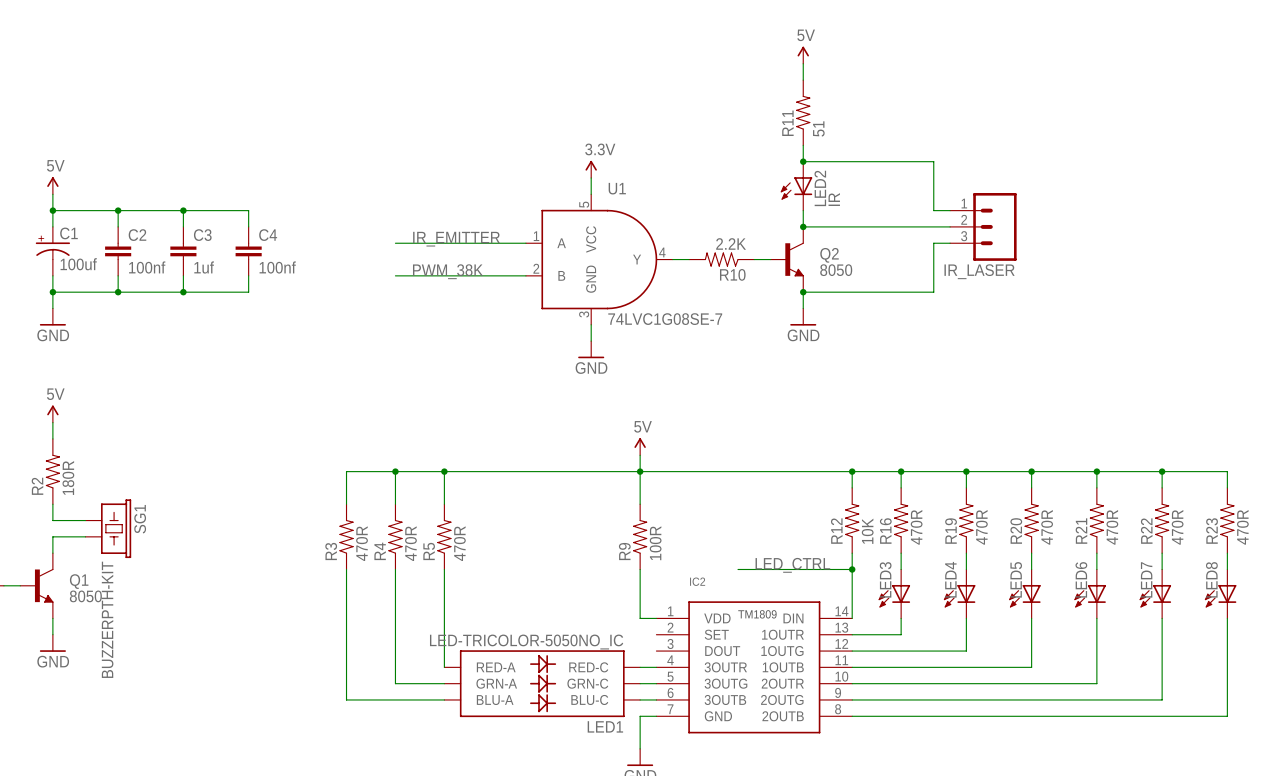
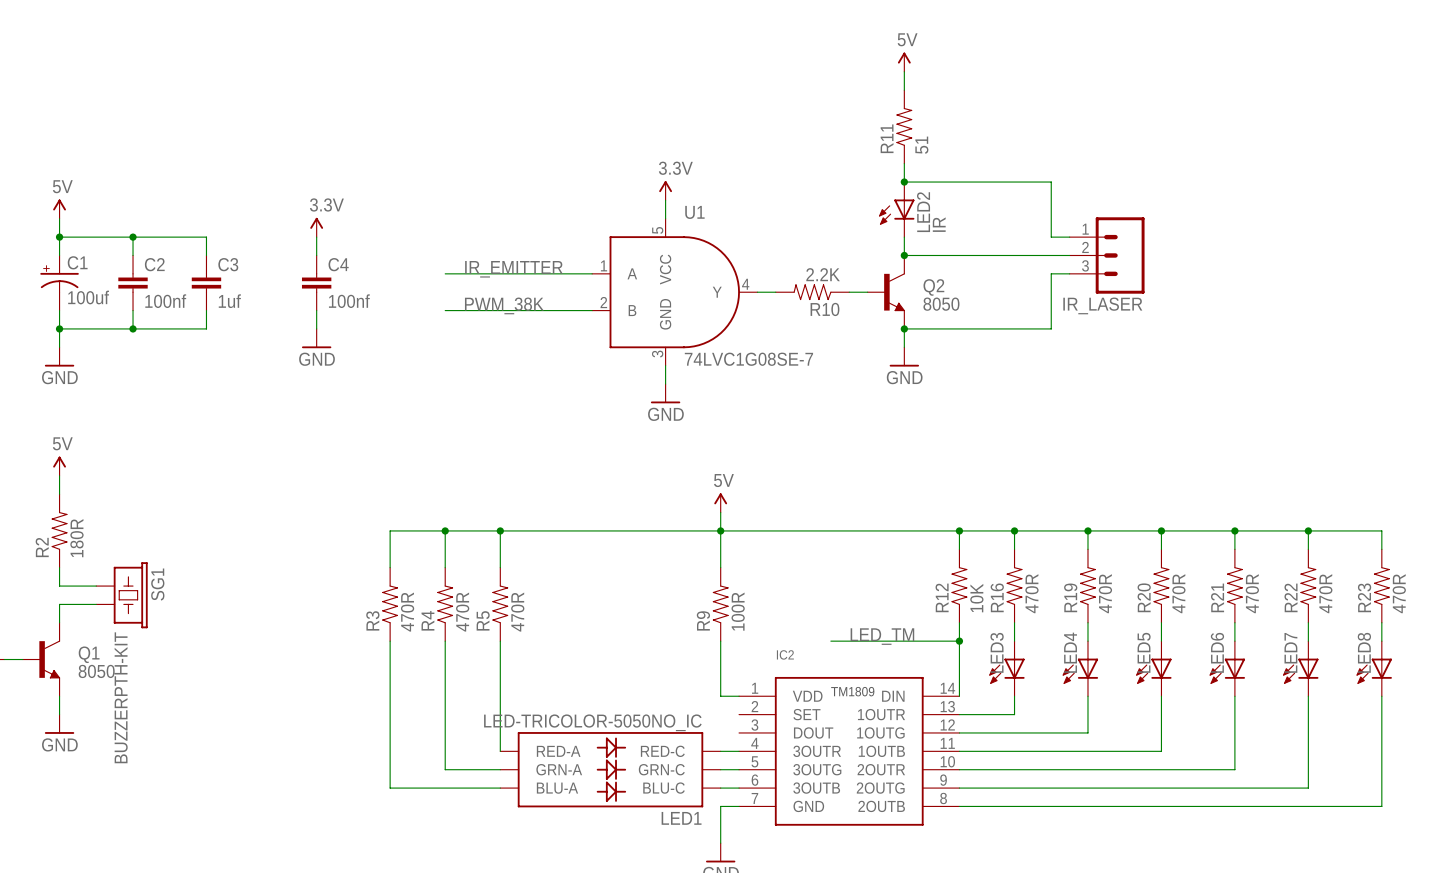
power symbol: none -> 3.3V (316, 227)
wire: (183, 210) (248, 210) (248, 226) -> none
junction: (183, 210) -> none
wire: none -> (316, 237) (316, 255)
C4 position: (248, 251) -> (316, 283)
wire: (248, 275) (248, 292) (183, 292) -> none
wire: none -> (316, 310) (316, 328)
junction: (183, 292) -> none
power symbol: none -> GND (316, 338)
label: LED_CTRL (792, 565) -> LED_TM (882, 636)

